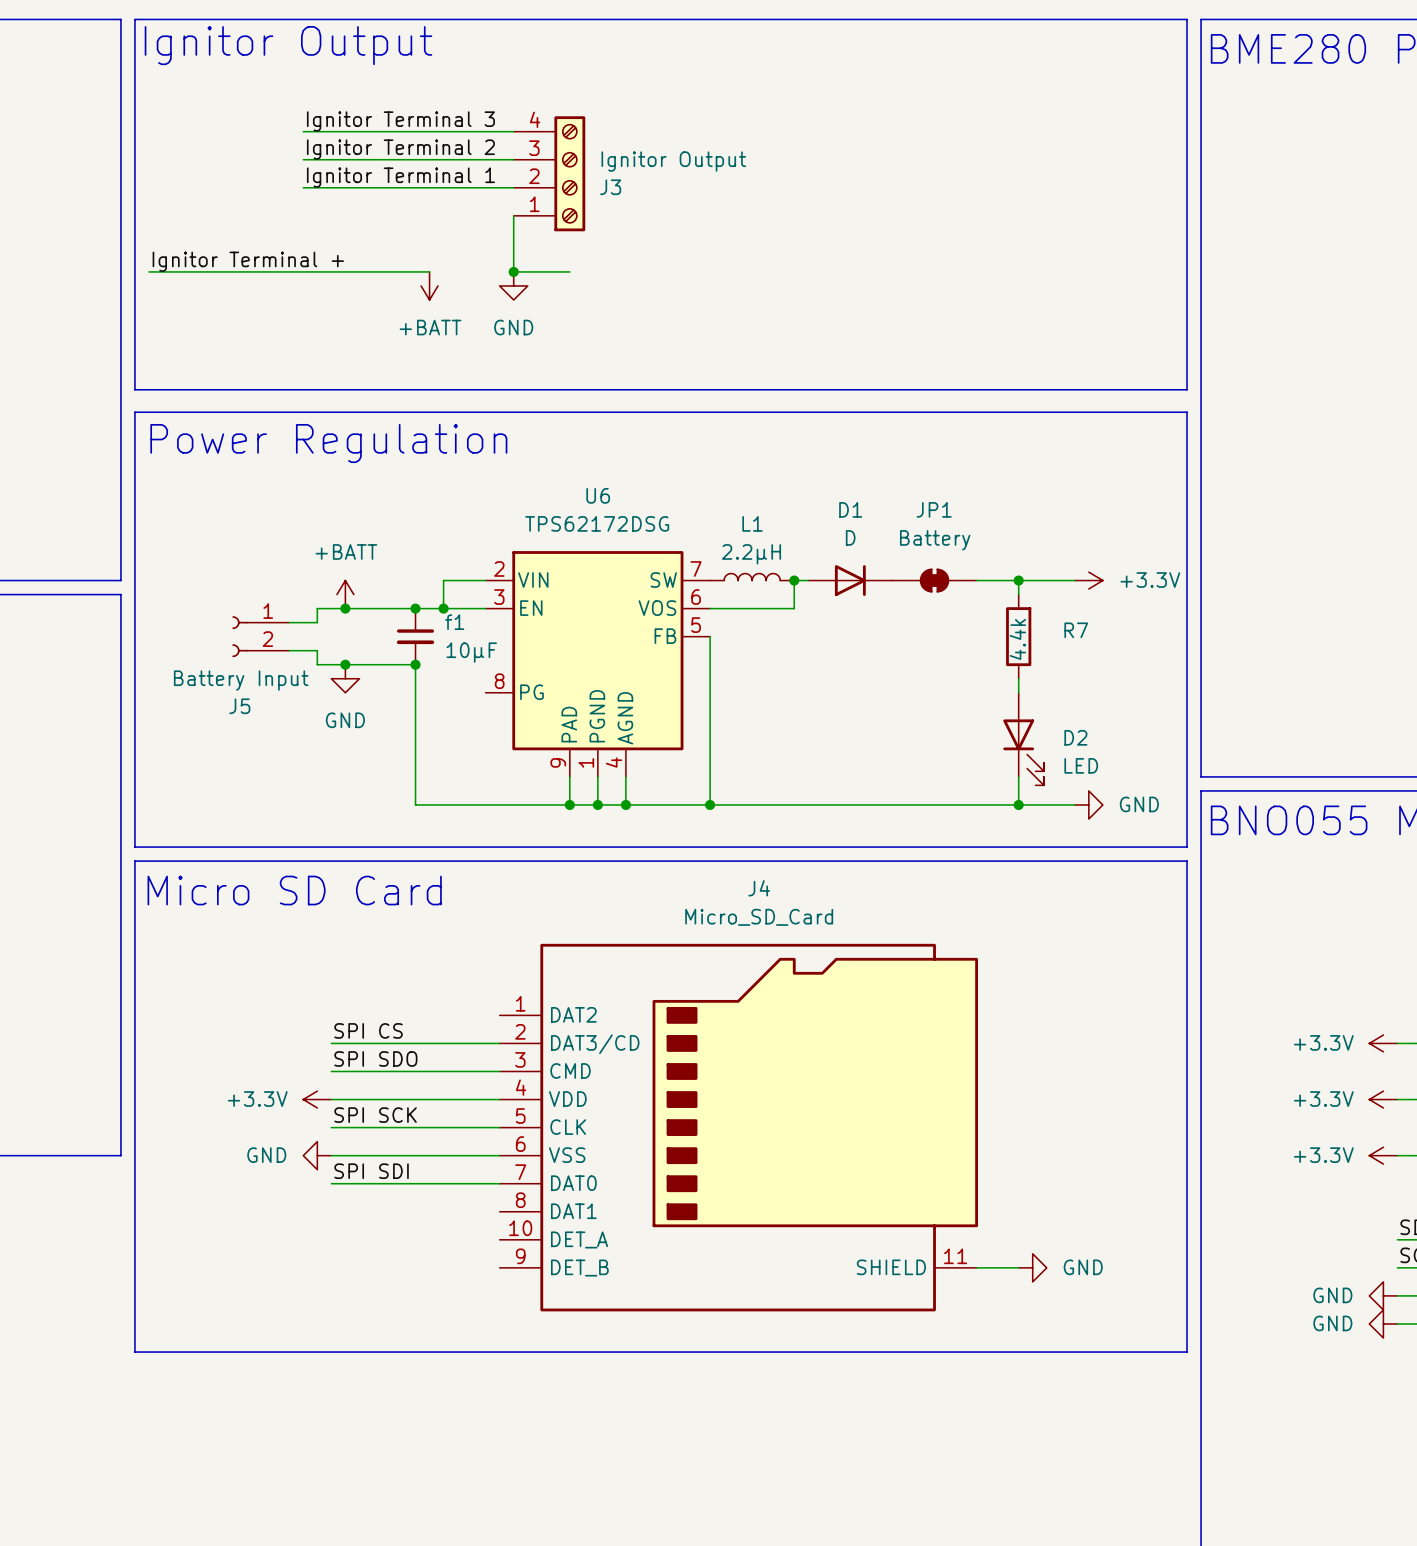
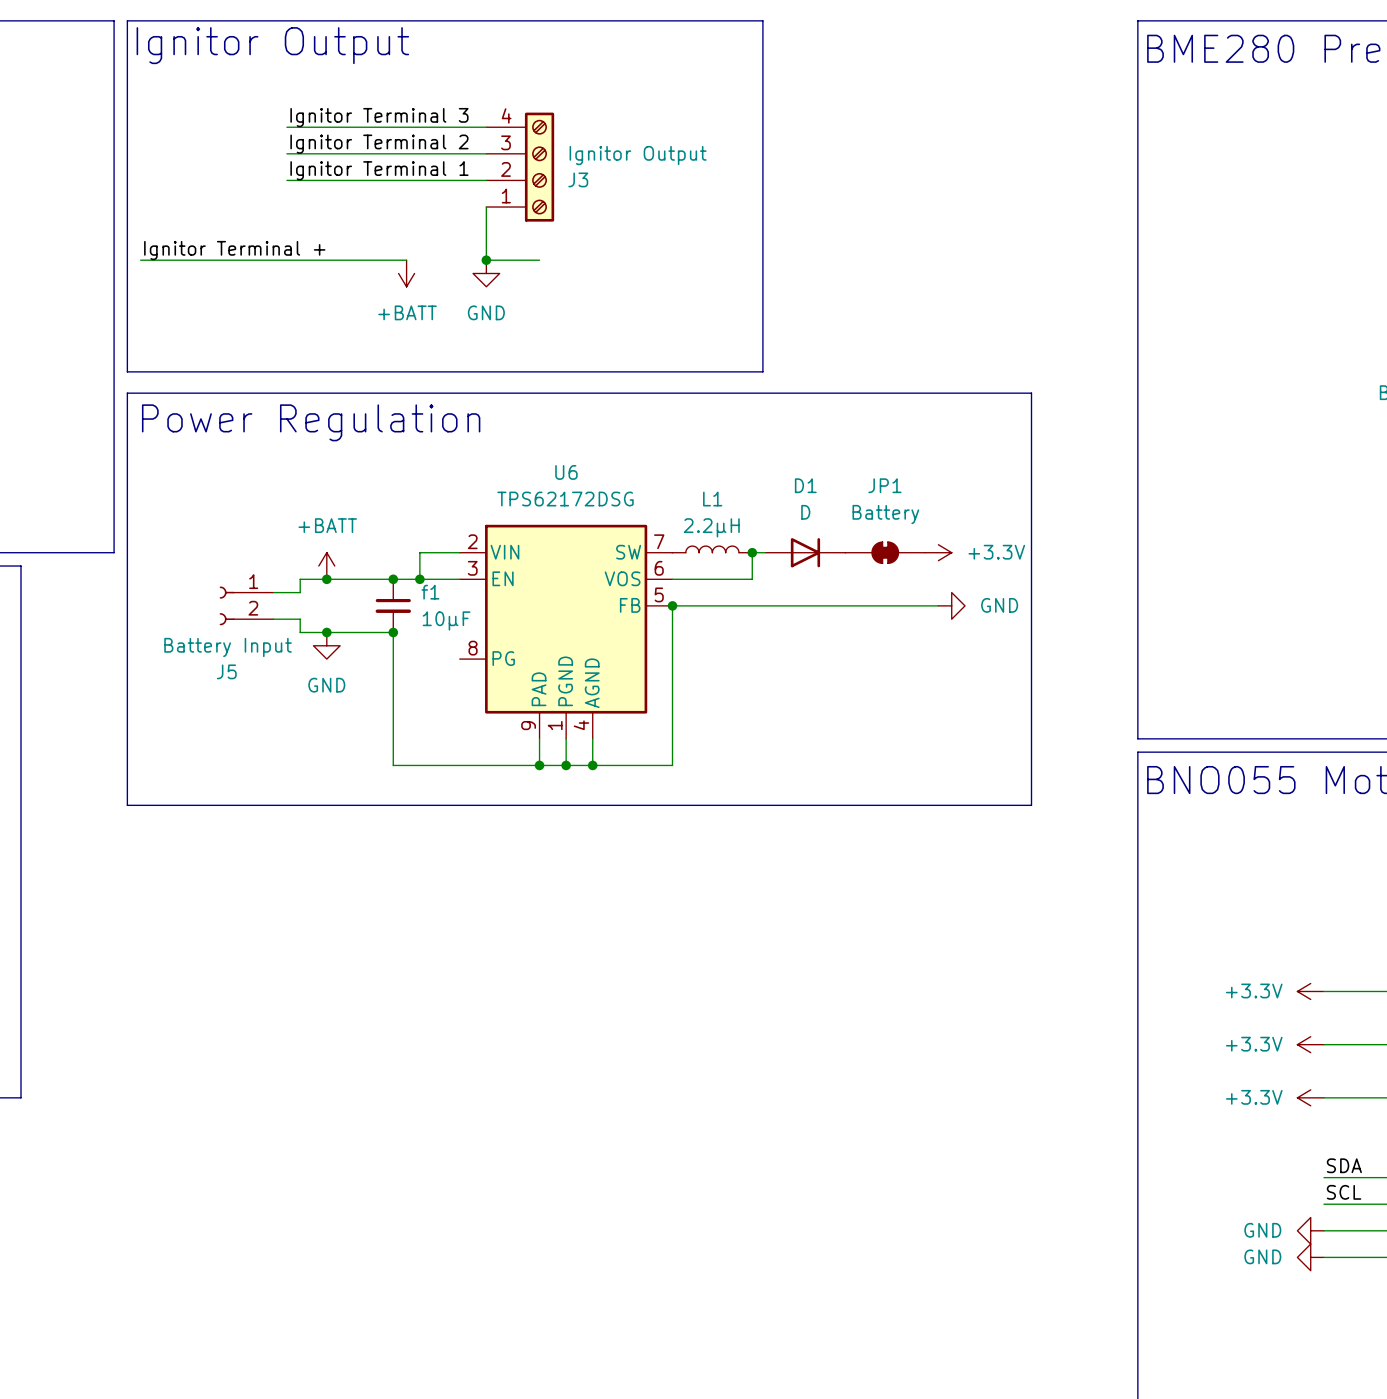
line: (805, 19) (1187, 19) (1187, 389) (805, 389) -> (762, 20) (762, 371)
line: (1088, 412) (1187, 412) (1187, 847) (1088, 847) -> (1031, 393) (1031, 805)
wire: (976, 580) (1074, 580) -> none
wire: (1018, 580) (1018, 594) -> none
junction: (1018, 580) -> none
power symbol position: +3.3V (1088, 580) -> +3.3V (938, 552)
line: (22, 594) (120, 594) (120, 1155) (22, 1155) -> (21, 566) (21, 1097)
wire: none -> (672, 605) (938, 605)
junction: none -> (672, 605)
R7: 4.4k (1018, 636) -> none
wire: (1018, 678) (1018, 692) -> none
D2: LED (1023, 739) -> none
wire: (1018, 776) (1018, 804) -> none
wire: (710, 804) (1074, 804) -> none
junction: (710, 804) -> none
junction: (1018, 804) -> none
power symbol position: GND (1088, 804) -> GND (951, 605)
line: (134, 861) (134, 1352) (1187, 1352) (1187, 861) (134, 861) -> none
text: Micro SD Card (294, 890) -> none
label: SPI CS (368, 1030) -> none
wire: (331, 1043) (499, 1043) -> none
label: SPI SDO (375, 1058) -> none
wire: (331, 1071) (499, 1071) -> none
power symbol: +3.3V (317, 1099) -> none
wire: (331, 1099) (499, 1099) -> none
label: SPI SCK (375, 1115) -> none
wire: (331, 1127) (499, 1127) -> none
J4: Micro_SD_Card (738, 1127) -> none
power symbol: GND (317, 1155) -> none
wire: (331, 1155) (499, 1155) -> none
label: SPI SDI (371, 1171) -> none
wire: (331, 1183) (499, 1183) -> none
wire: (976, 1267) (1018, 1267) -> none
power symbol: GND (1032, 1267) -> none

